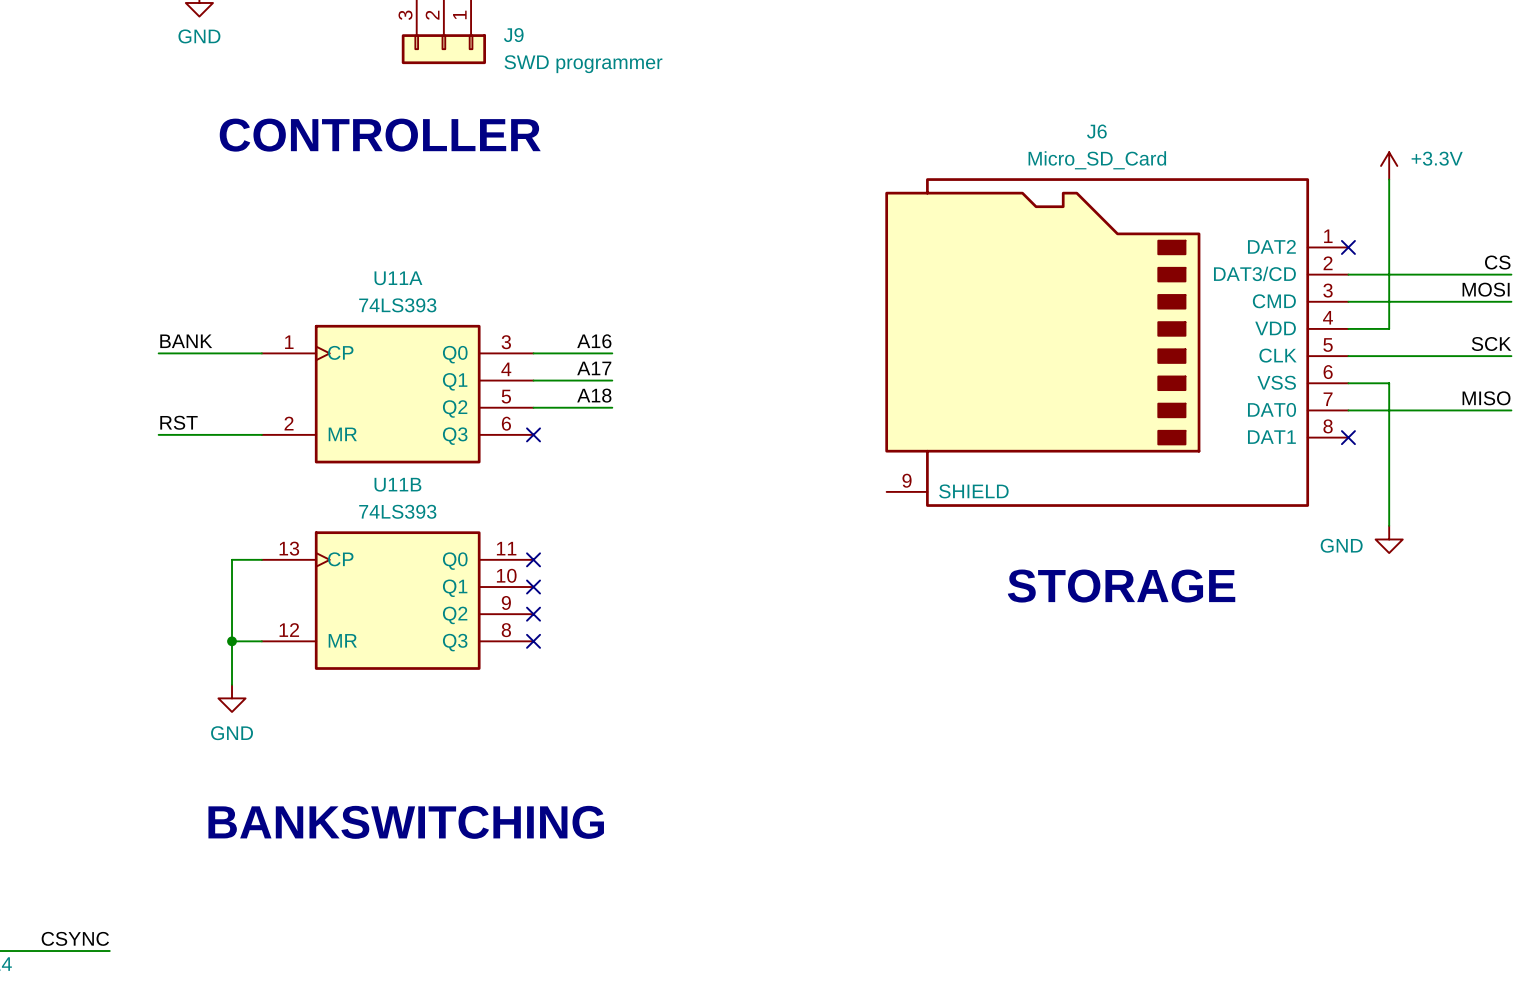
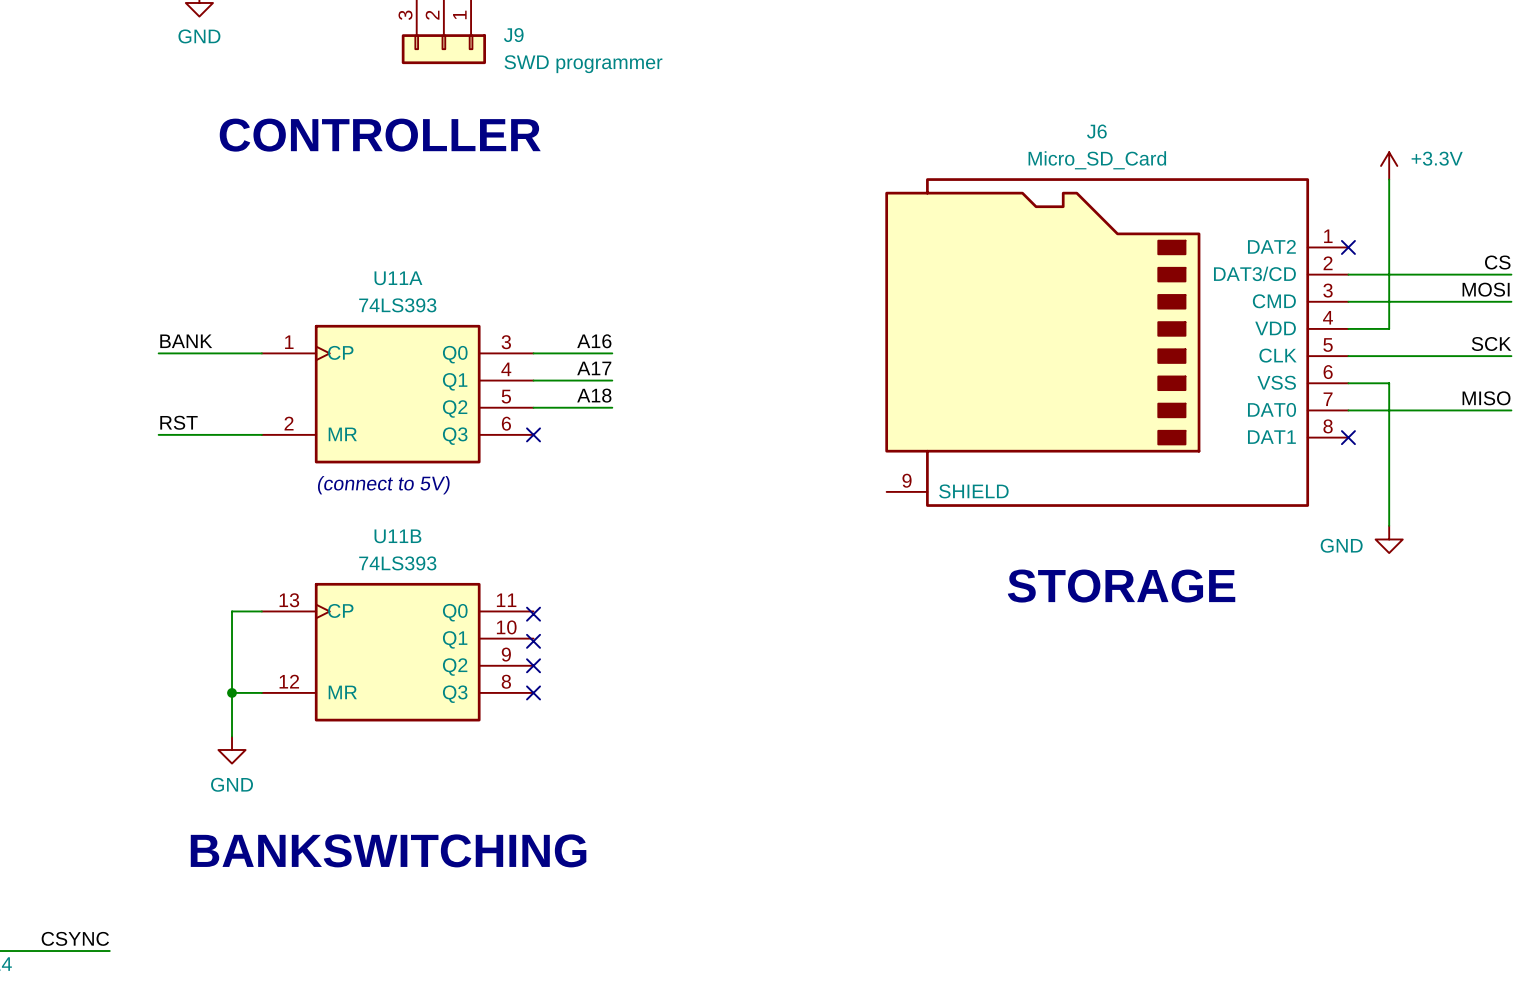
text: none -> (connect to 5V) (383, 485)
wire: (261, 559) (232, 559) (232, 611) -> (261, 611) (232, 611)
no-connect mark: (533, 559) -> none
no-connect mark: (533, 587) -> none
U11B position: (397, 600) -> (397, 652)
wire: (232, 641) (261, 641) -> (232, 692) (261, 692)
junction position: (232, 641) -> (232, 692)
no-connect mark: none -> (533, 665)
wire: none -> (232, 684) (232, 736)
no-connect mark: none -> (533, 692)
power symbol position: GND (232, 698) -> GND (232, 749)
text position: BANKSWITCHING (406, 822) -> BANKSWITCHING (388, 850)

